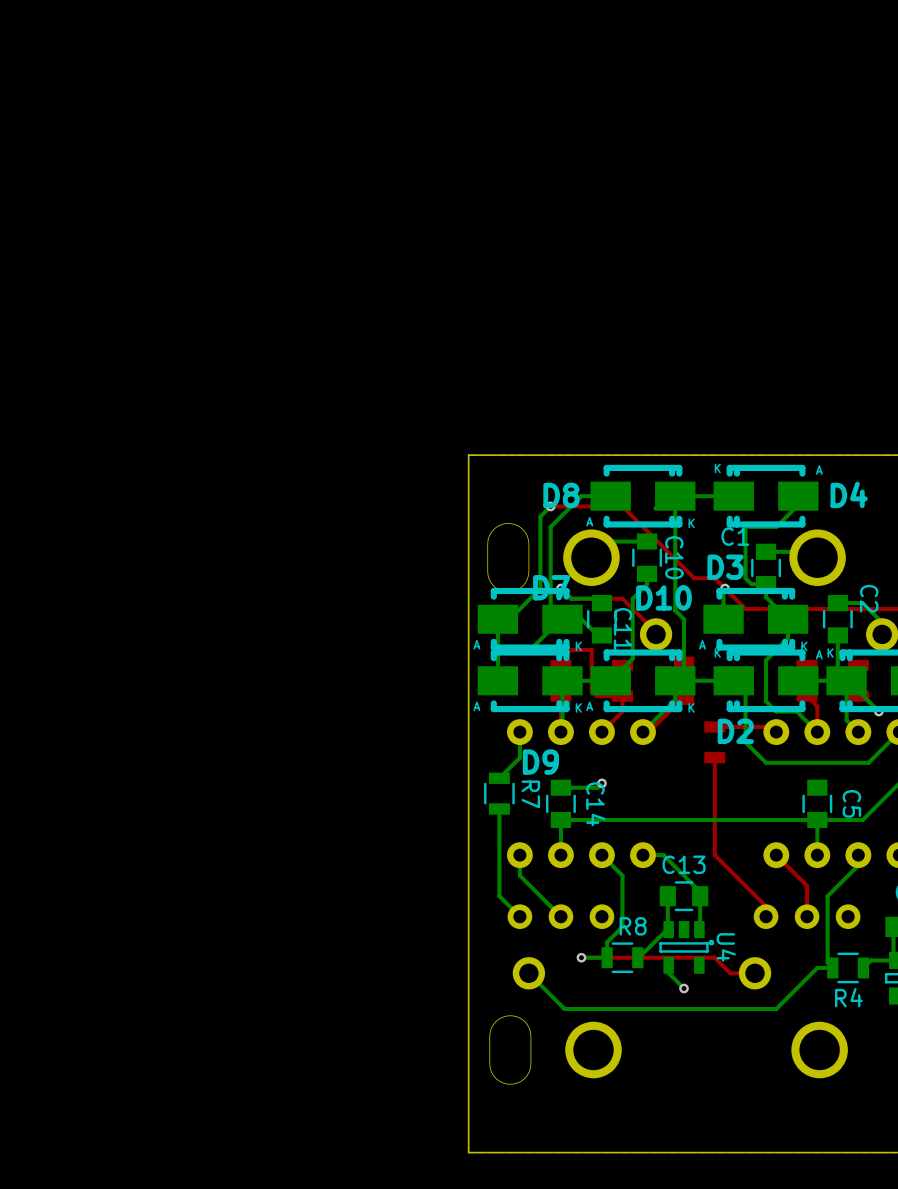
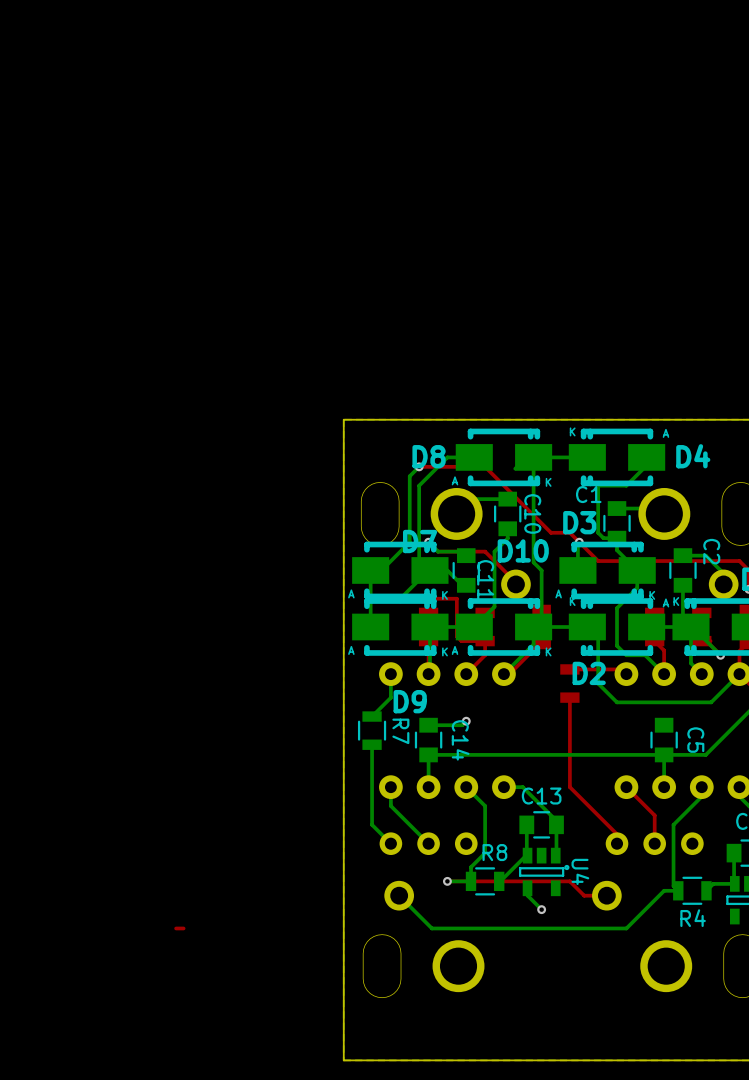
top track: none -> (183, 928) (176, 928)

